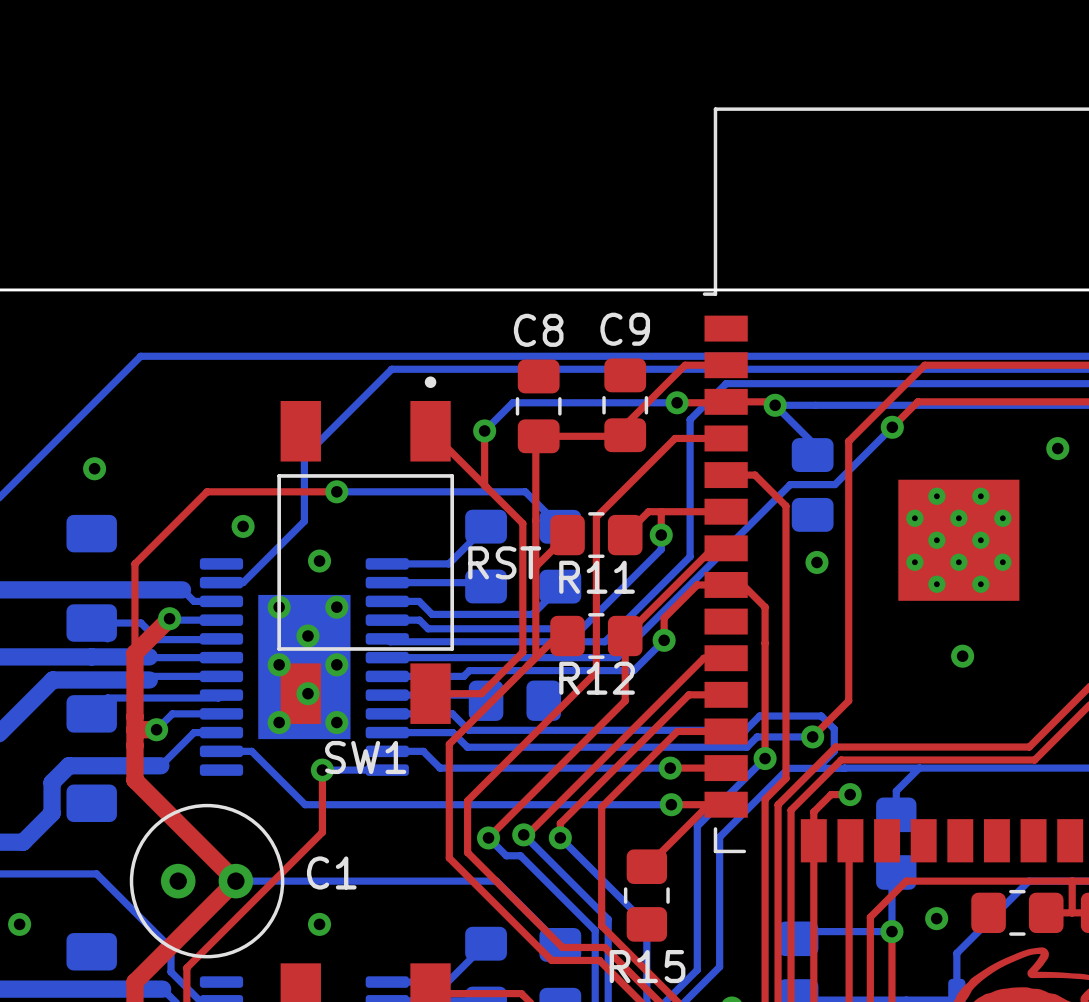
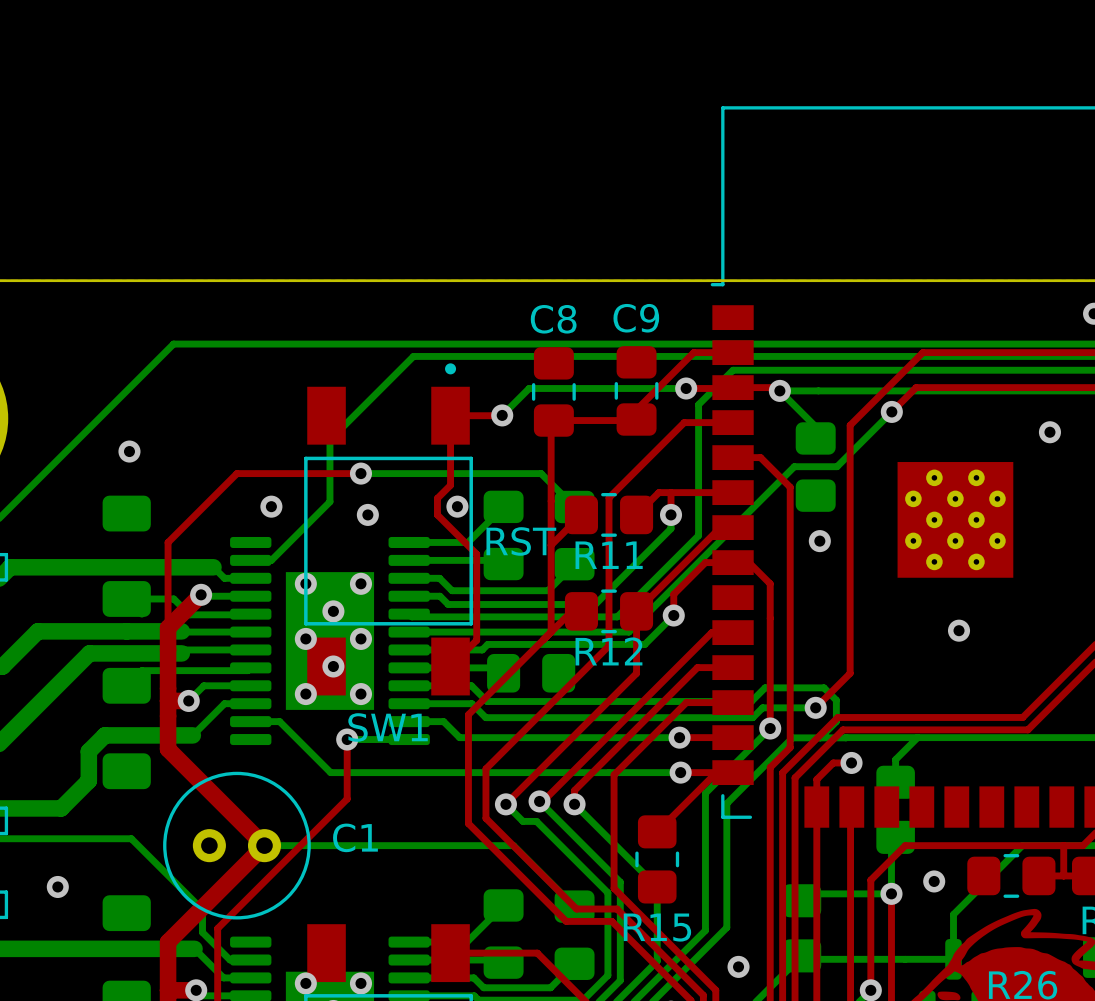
top track: (484, 430) (484, 485) -> none
top track: (430, 431) (522, 523) (522, 652) (481, 693) (430, 693) -> (501, 415) (450, 415) (450, 485) (437, 498) (437, 514) (476, 554) (476, 640) (450, 666)
via: none -> (457, 506)
via position: (319, 561) -> (367, 514)
via: (319, 924) -> none

